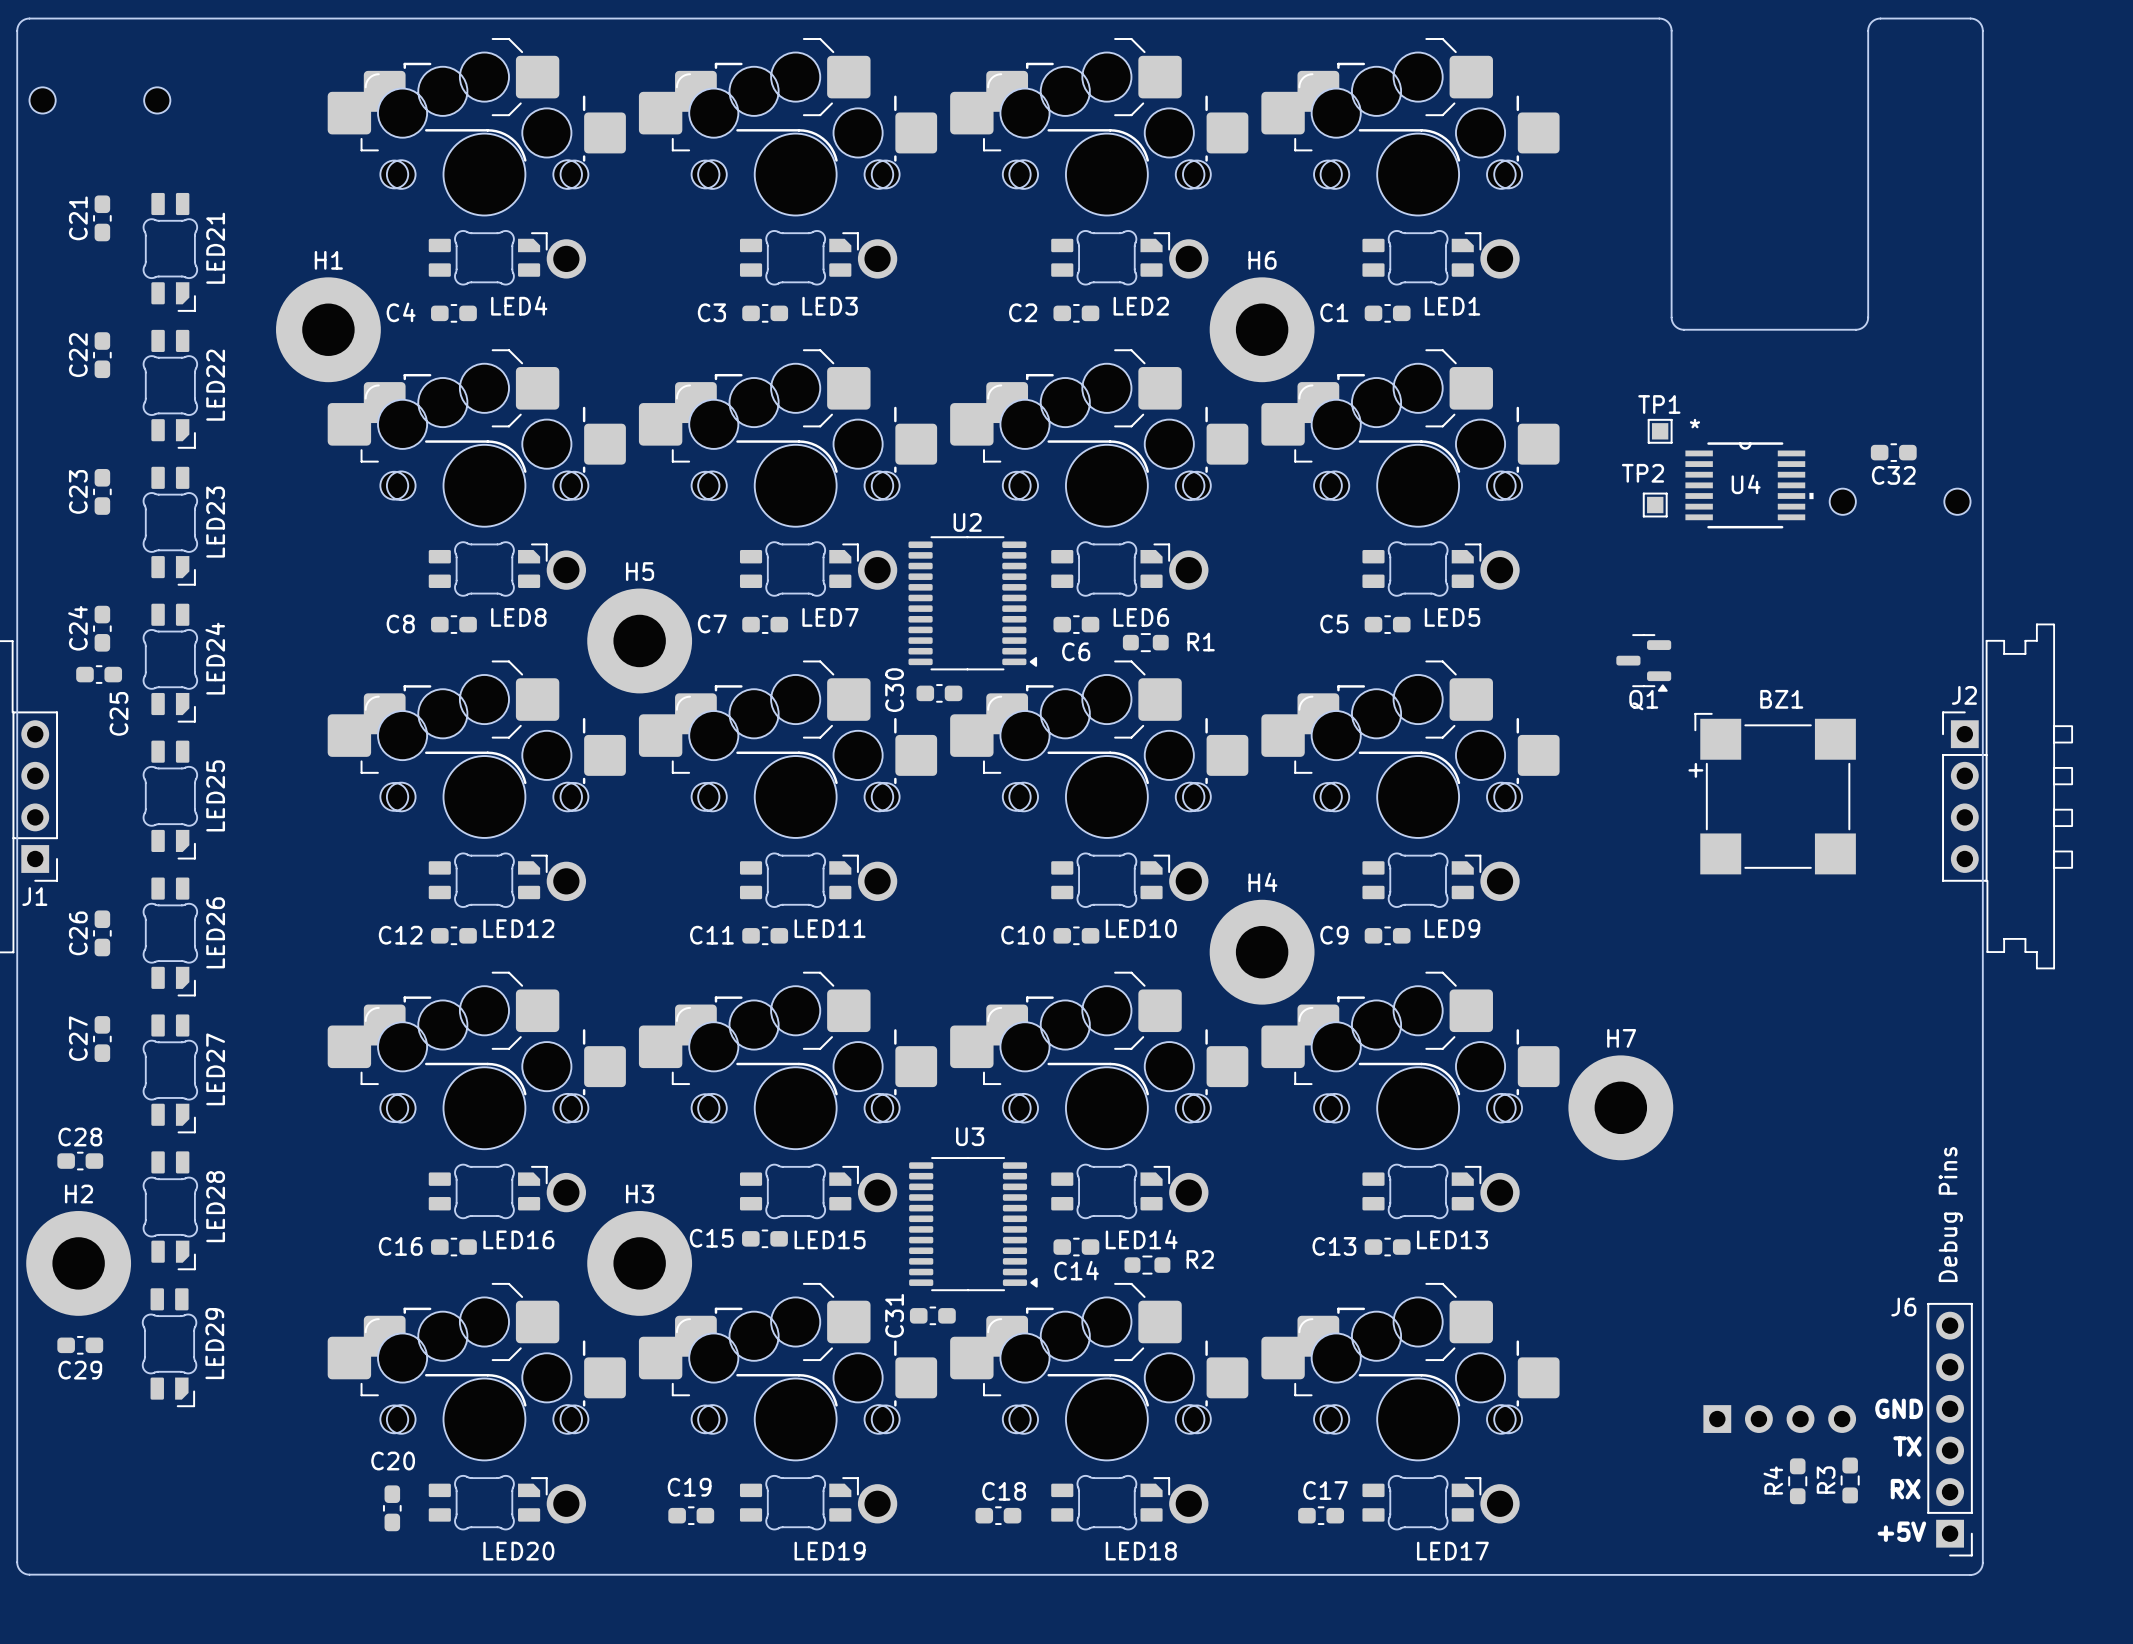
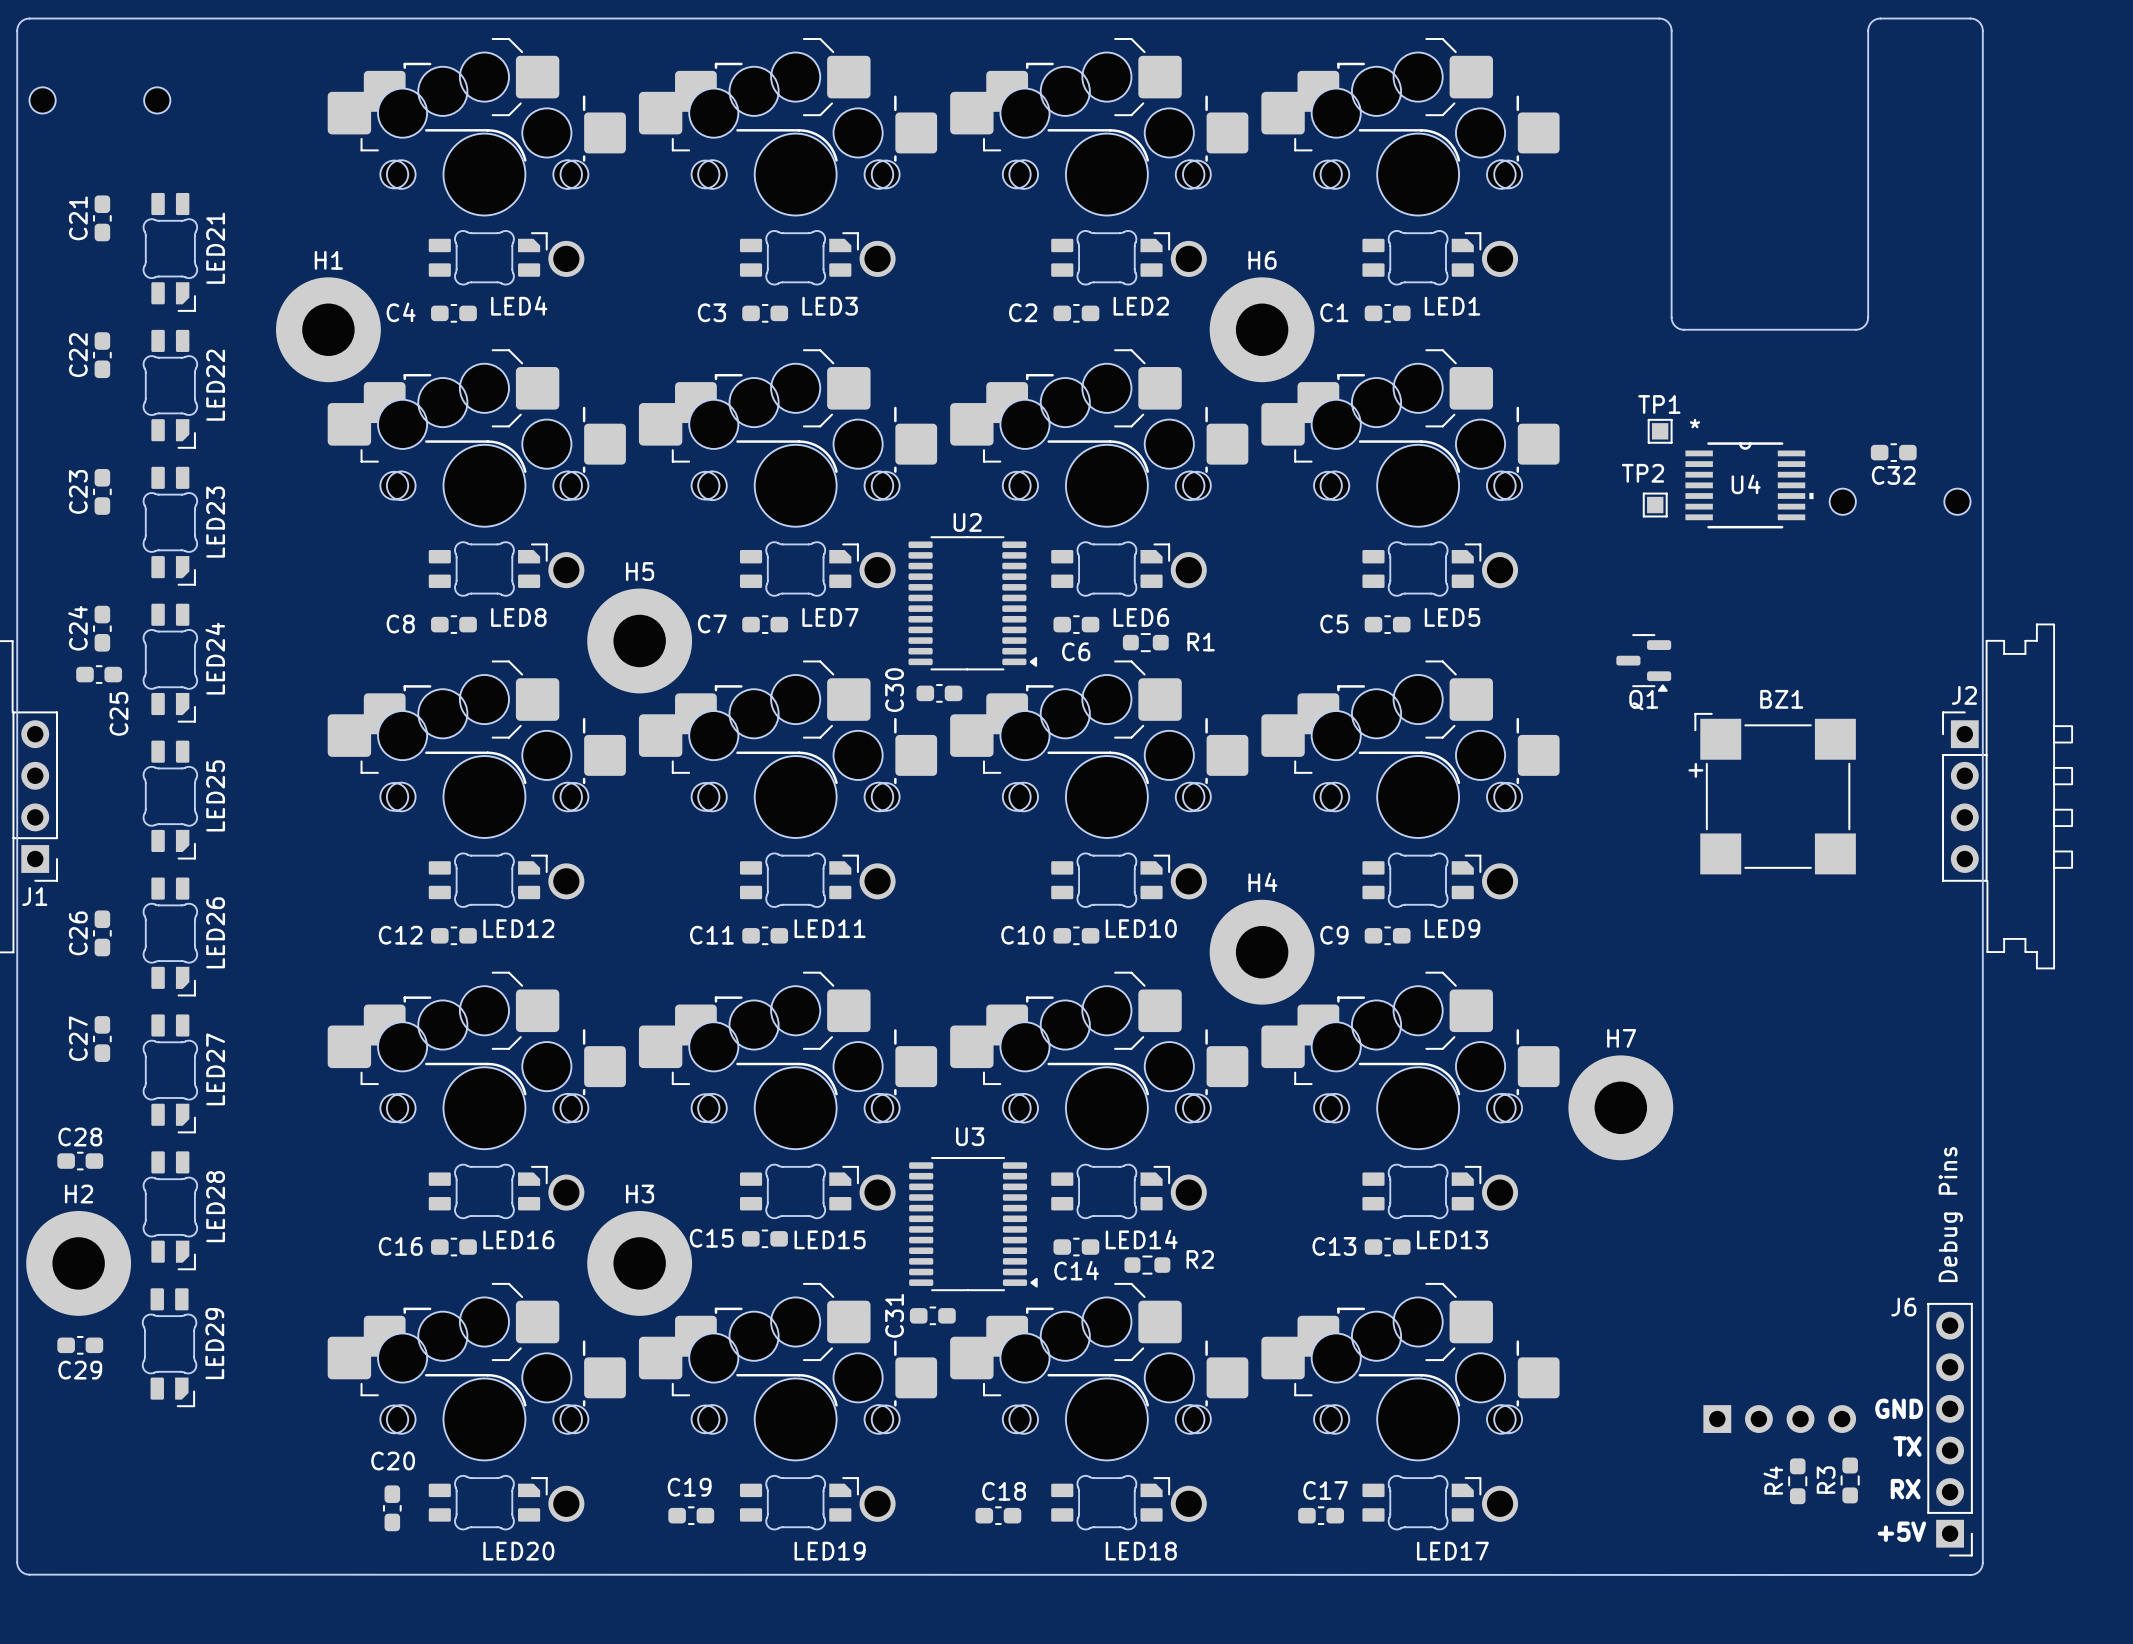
part footprint: [327, 38, 626, 279] -> [327, 38, 626, 277]
part footprint: [638, 38, 938, 279] -> [638, 38, 938, 277]
part footprint: [950, 38, 1249, 279] -> [950, 38, 1249, 277]
part footprint: [1261, 38, 1560, 279] -> [1261, 38, 1560, 277]
part footprint: [327, 349, 626, 590] -> [327, 349, 626, 589]
part footprint: [638, 349, 938, 590] -> [638, 349, 938, 589]
part footprint: [950, 349, 1249, 590] -> [950, 349, 1249, 589]
part footprint: [1261, 349, 1560, 590] -> [1261, 349, 1560, 589]
part footprint: [327, 660, 626, 902] -> [327, 660, 626, 900]
part footprint: [638, 660, 938, 902] -> [638, 660, 938, 900]
part footprint: [950, 660, 1249, 902] -> [950, 660, 1249, 900]
part footprint: [1261, 660, 1560, 902] -> [1261, 660, 1560, 900]
part footprint: [327, 971, 626, 1213] -> [327, 971, 626, 1211]
part footprint: [638, 971, 938, 1213] -> [638, 971, 938, 1211]
part footprint: [950, 971, 1249, 1213] -> [950, 971, 1249, 1211]
part footprint: [1261, 971, 1560, 1213] -> [1261, 971, 1560, 1211]
part footprint: [327, 1282, 626, 1524] -> [327, 1282, 626, 1522]
part footprint: [638, 1282, 938, 1524] -> [638, 1282, 938, 1522]
part footprint: [950, 1282, 1249, 1524] -> [950, 1282, 1249, 1522]
part footprint: [1261, 1282, 1560, 1524] -> [1261, 1282, 1560, 1522]

